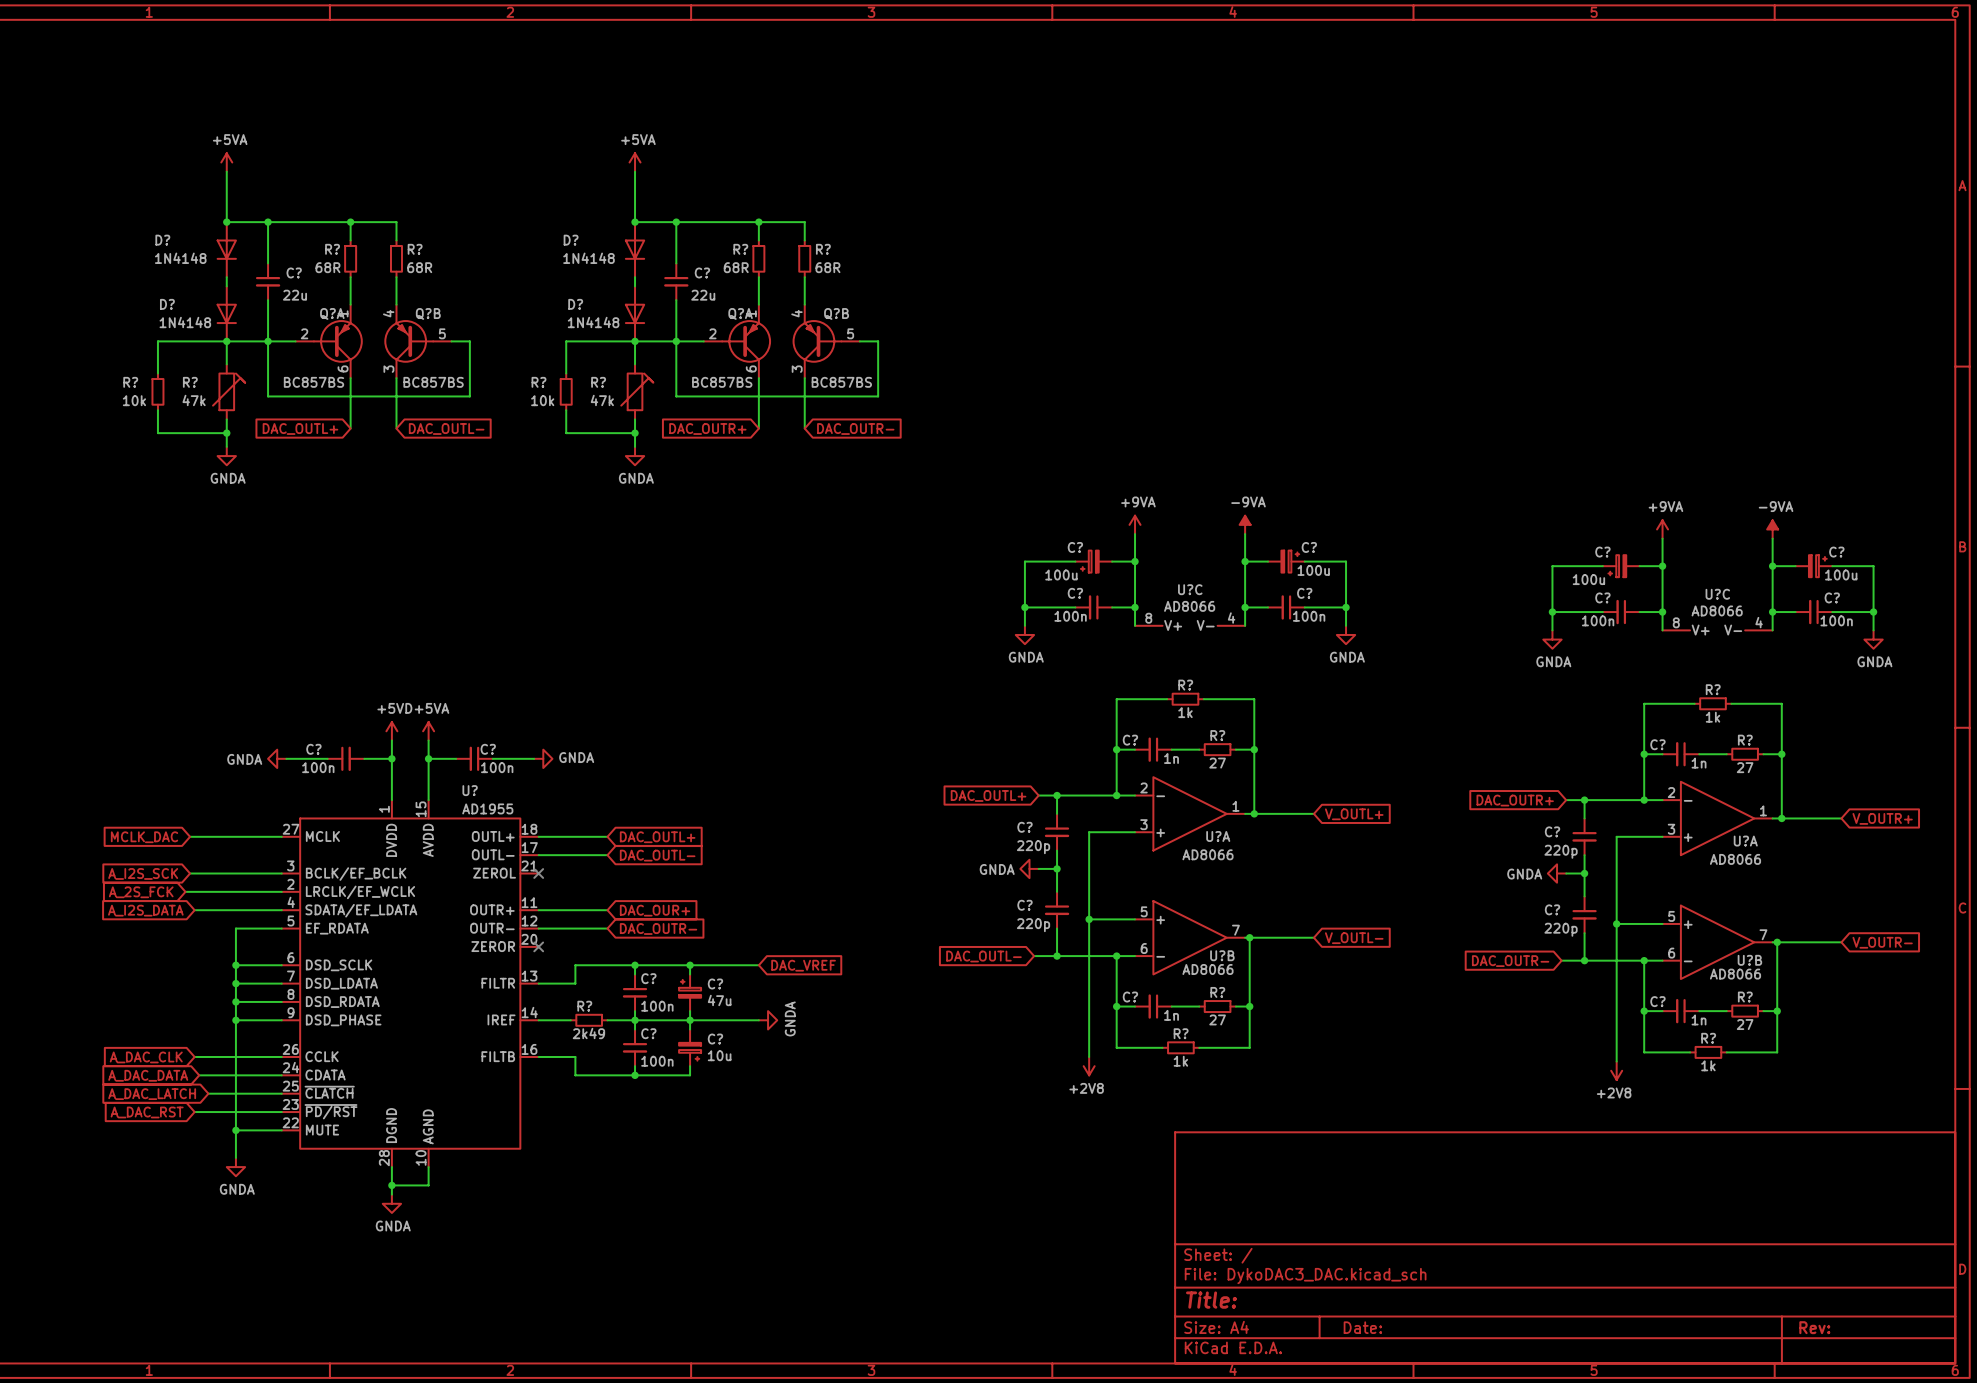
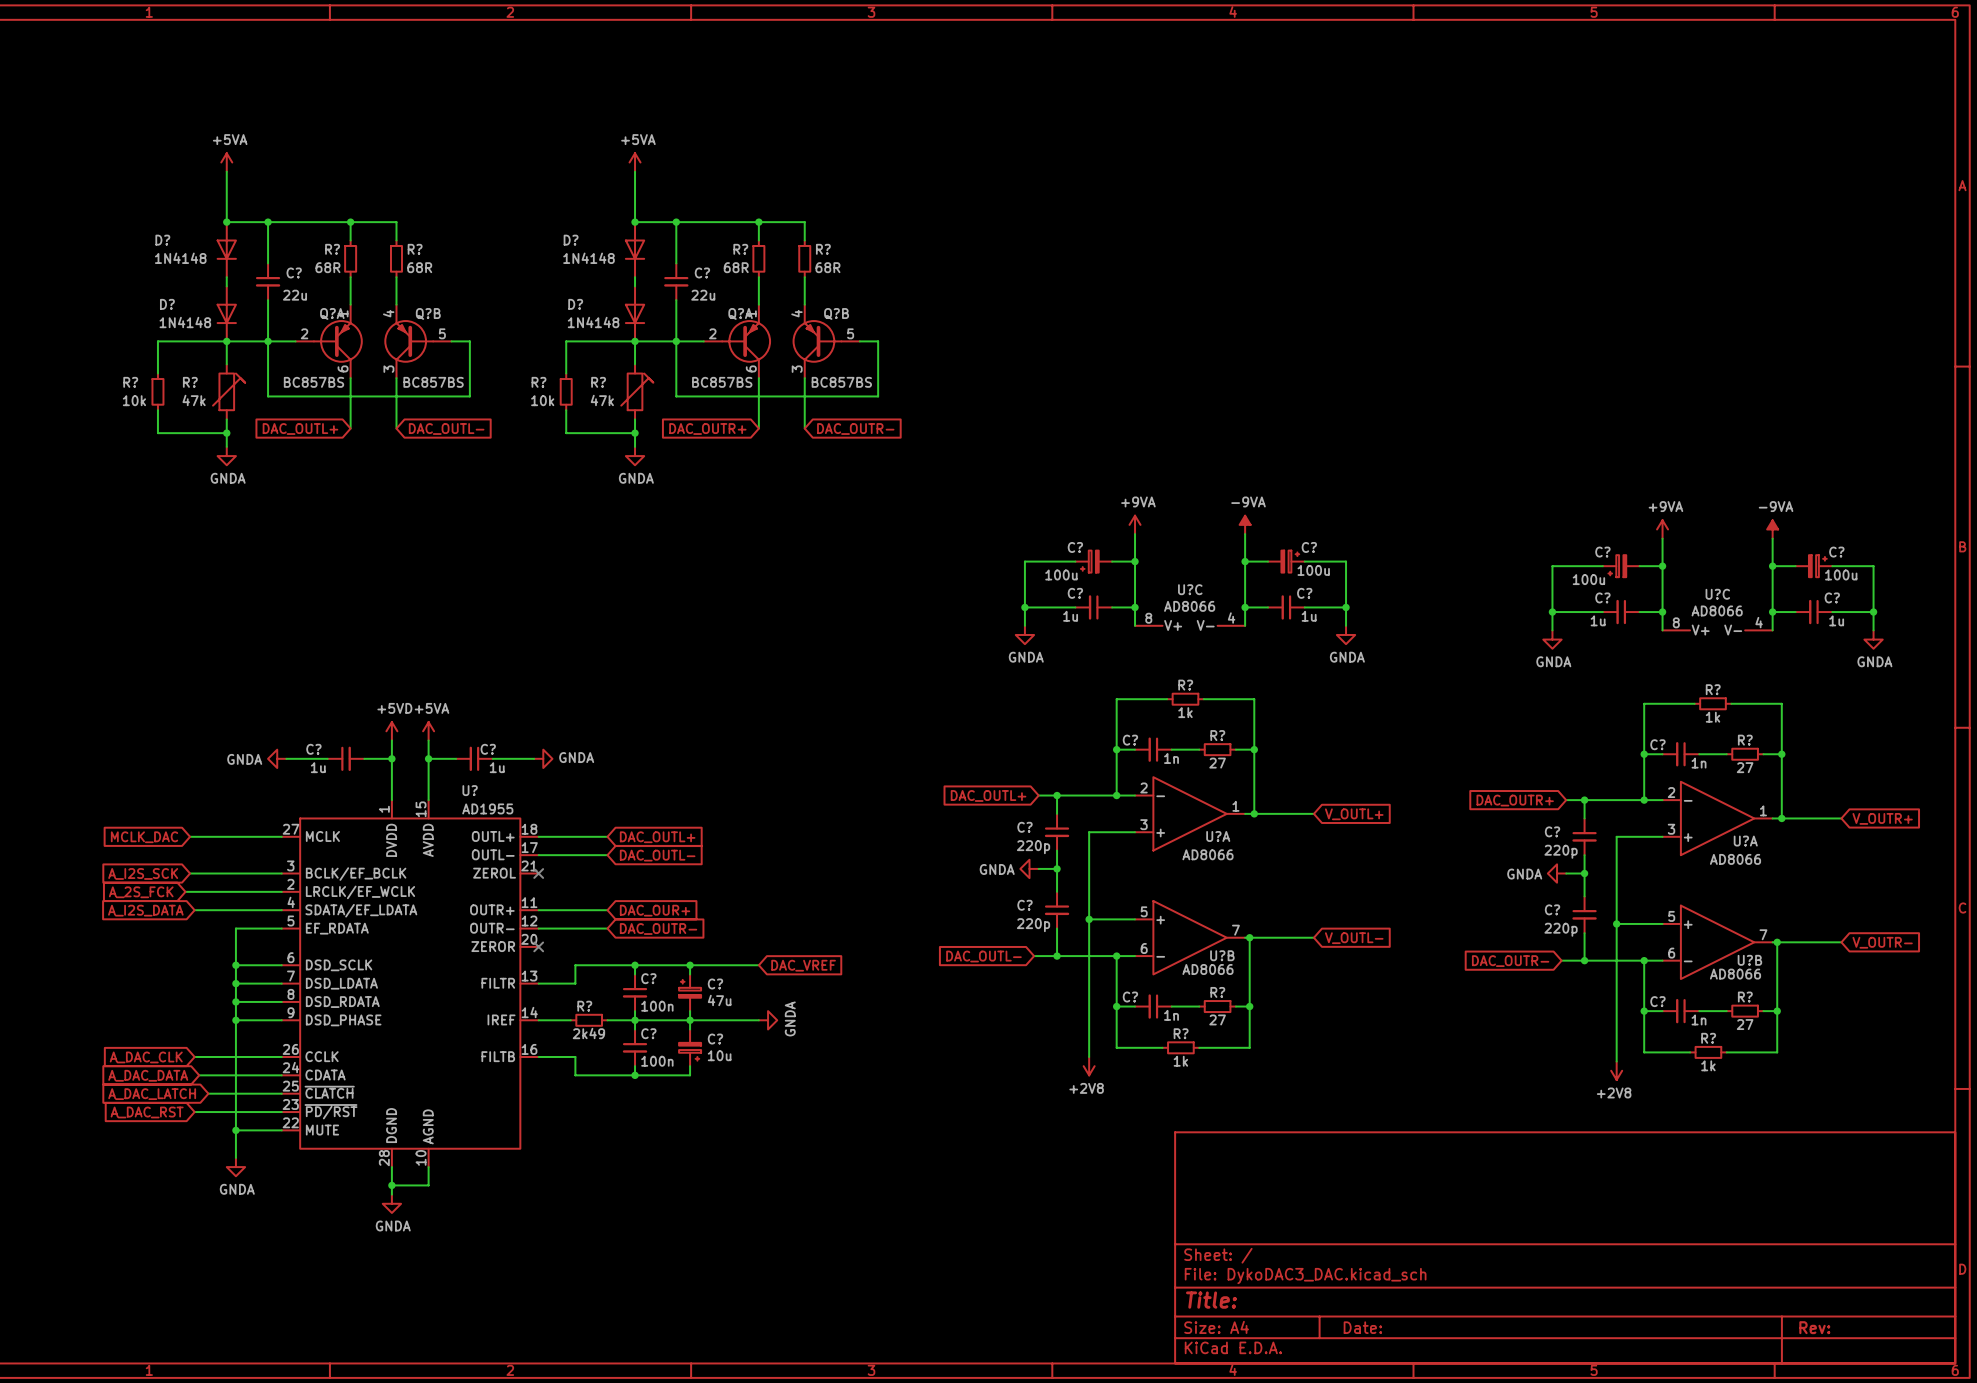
C? value: 100n (1070, 616) -> 1u (1070, 616)
C? value: 100n (1309, 616) -> 1u (1309, 616)
C? value: 100n (1598, 620) -> 1u (1598, 620)
C? value: 100n (1836, 620) -> 1u (1836, 620)
C? value: 100n (318, 767) -> 1u (318, 767)
C? value: 100n (497, 767) -> 1u (497, 767)

